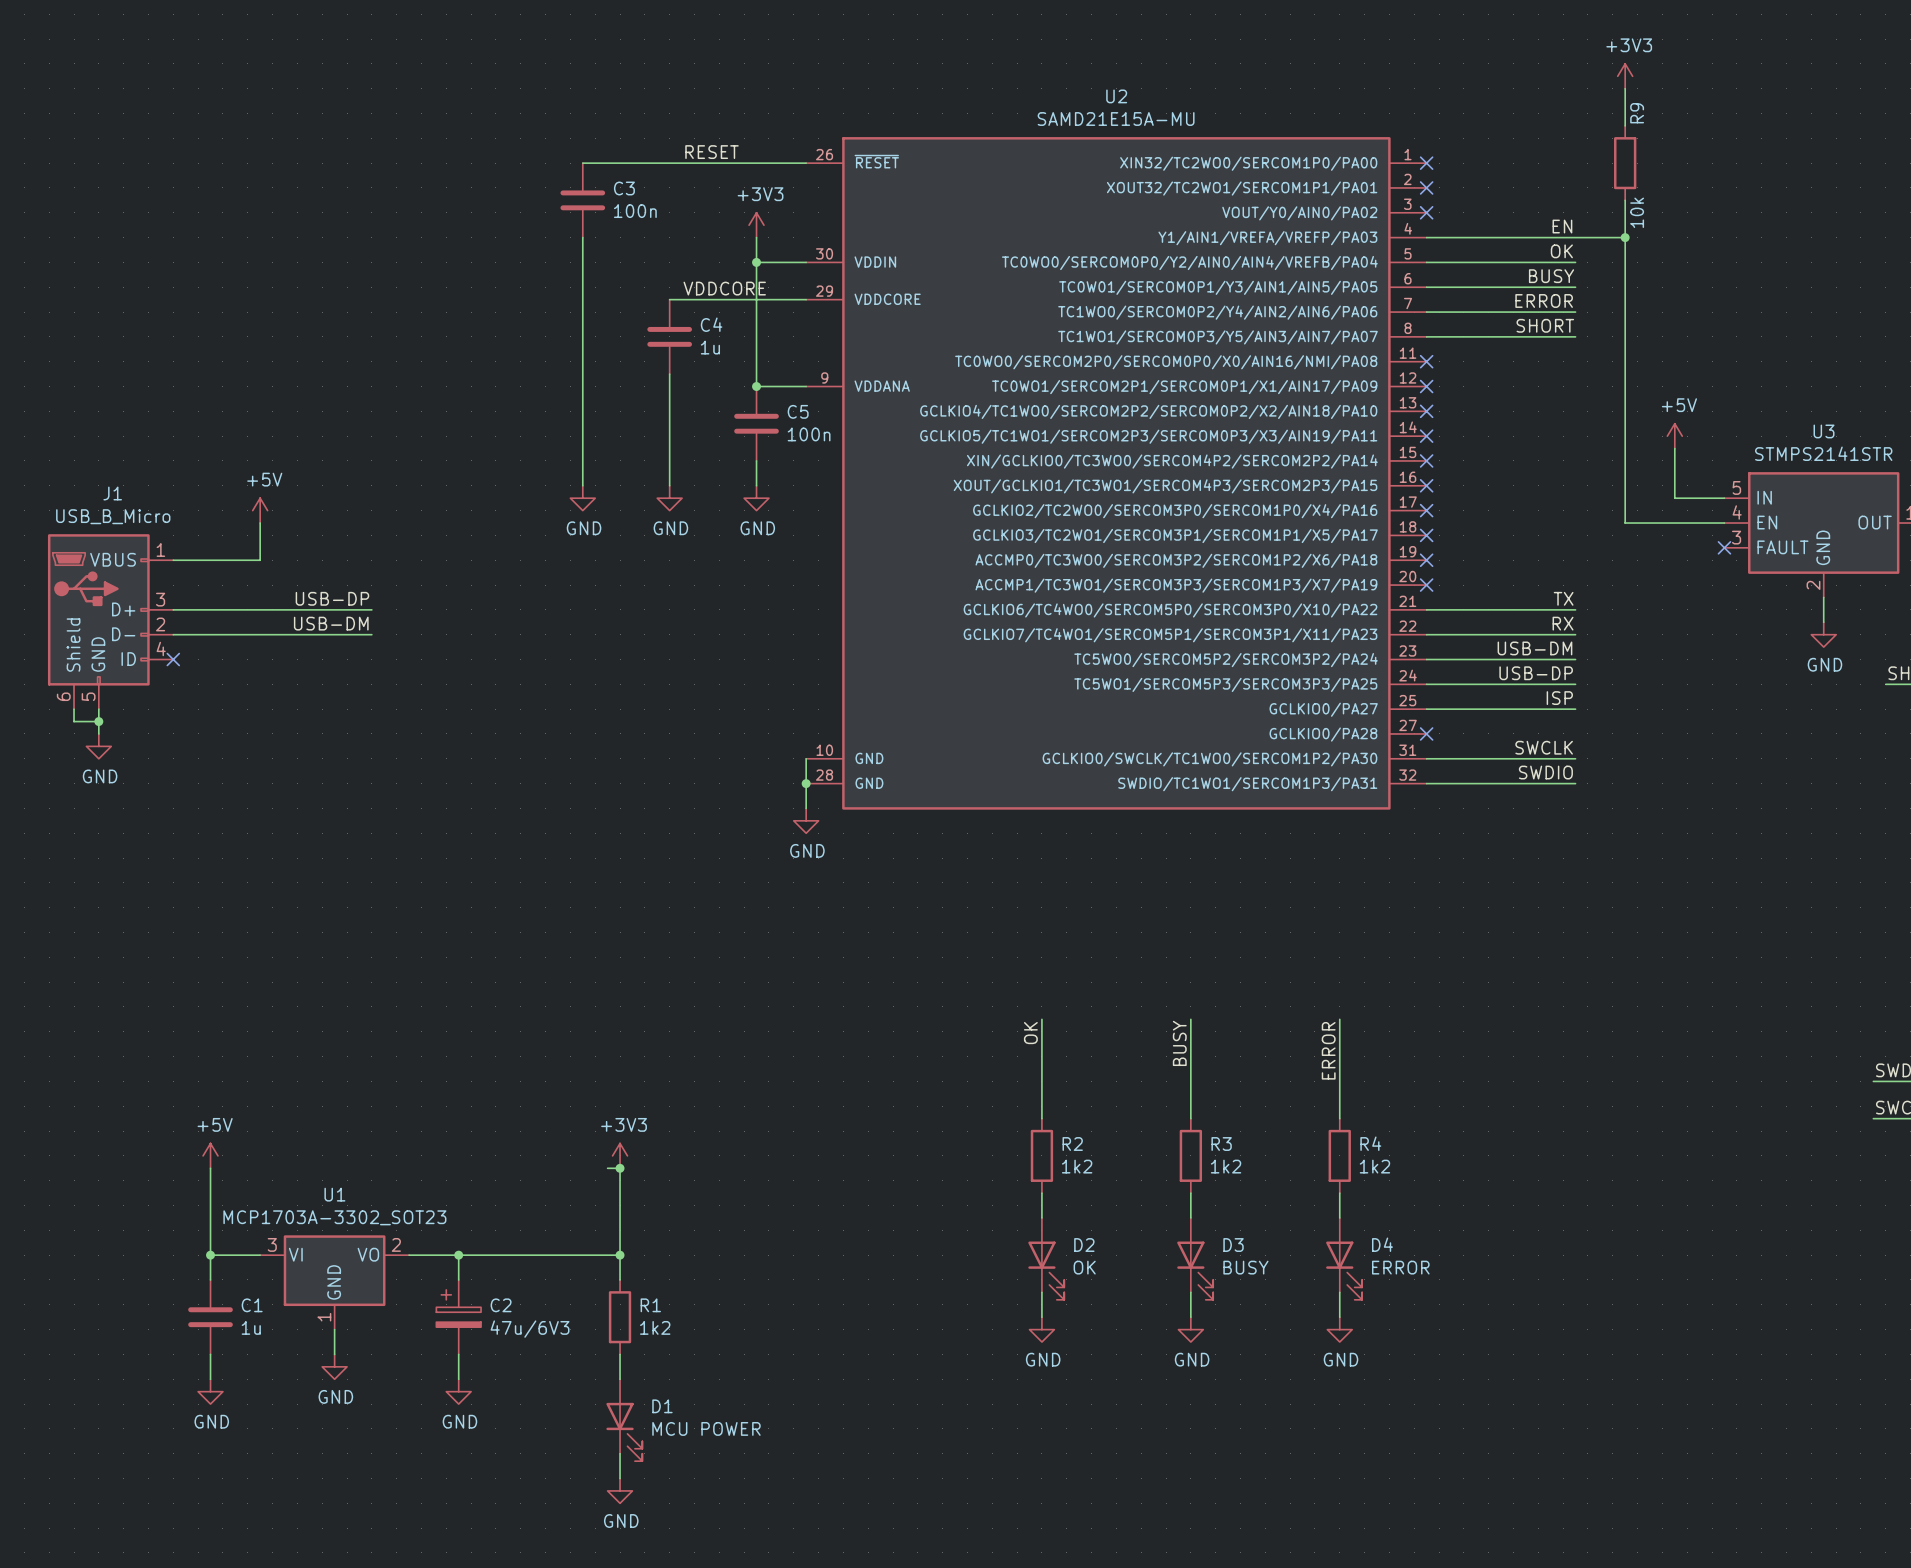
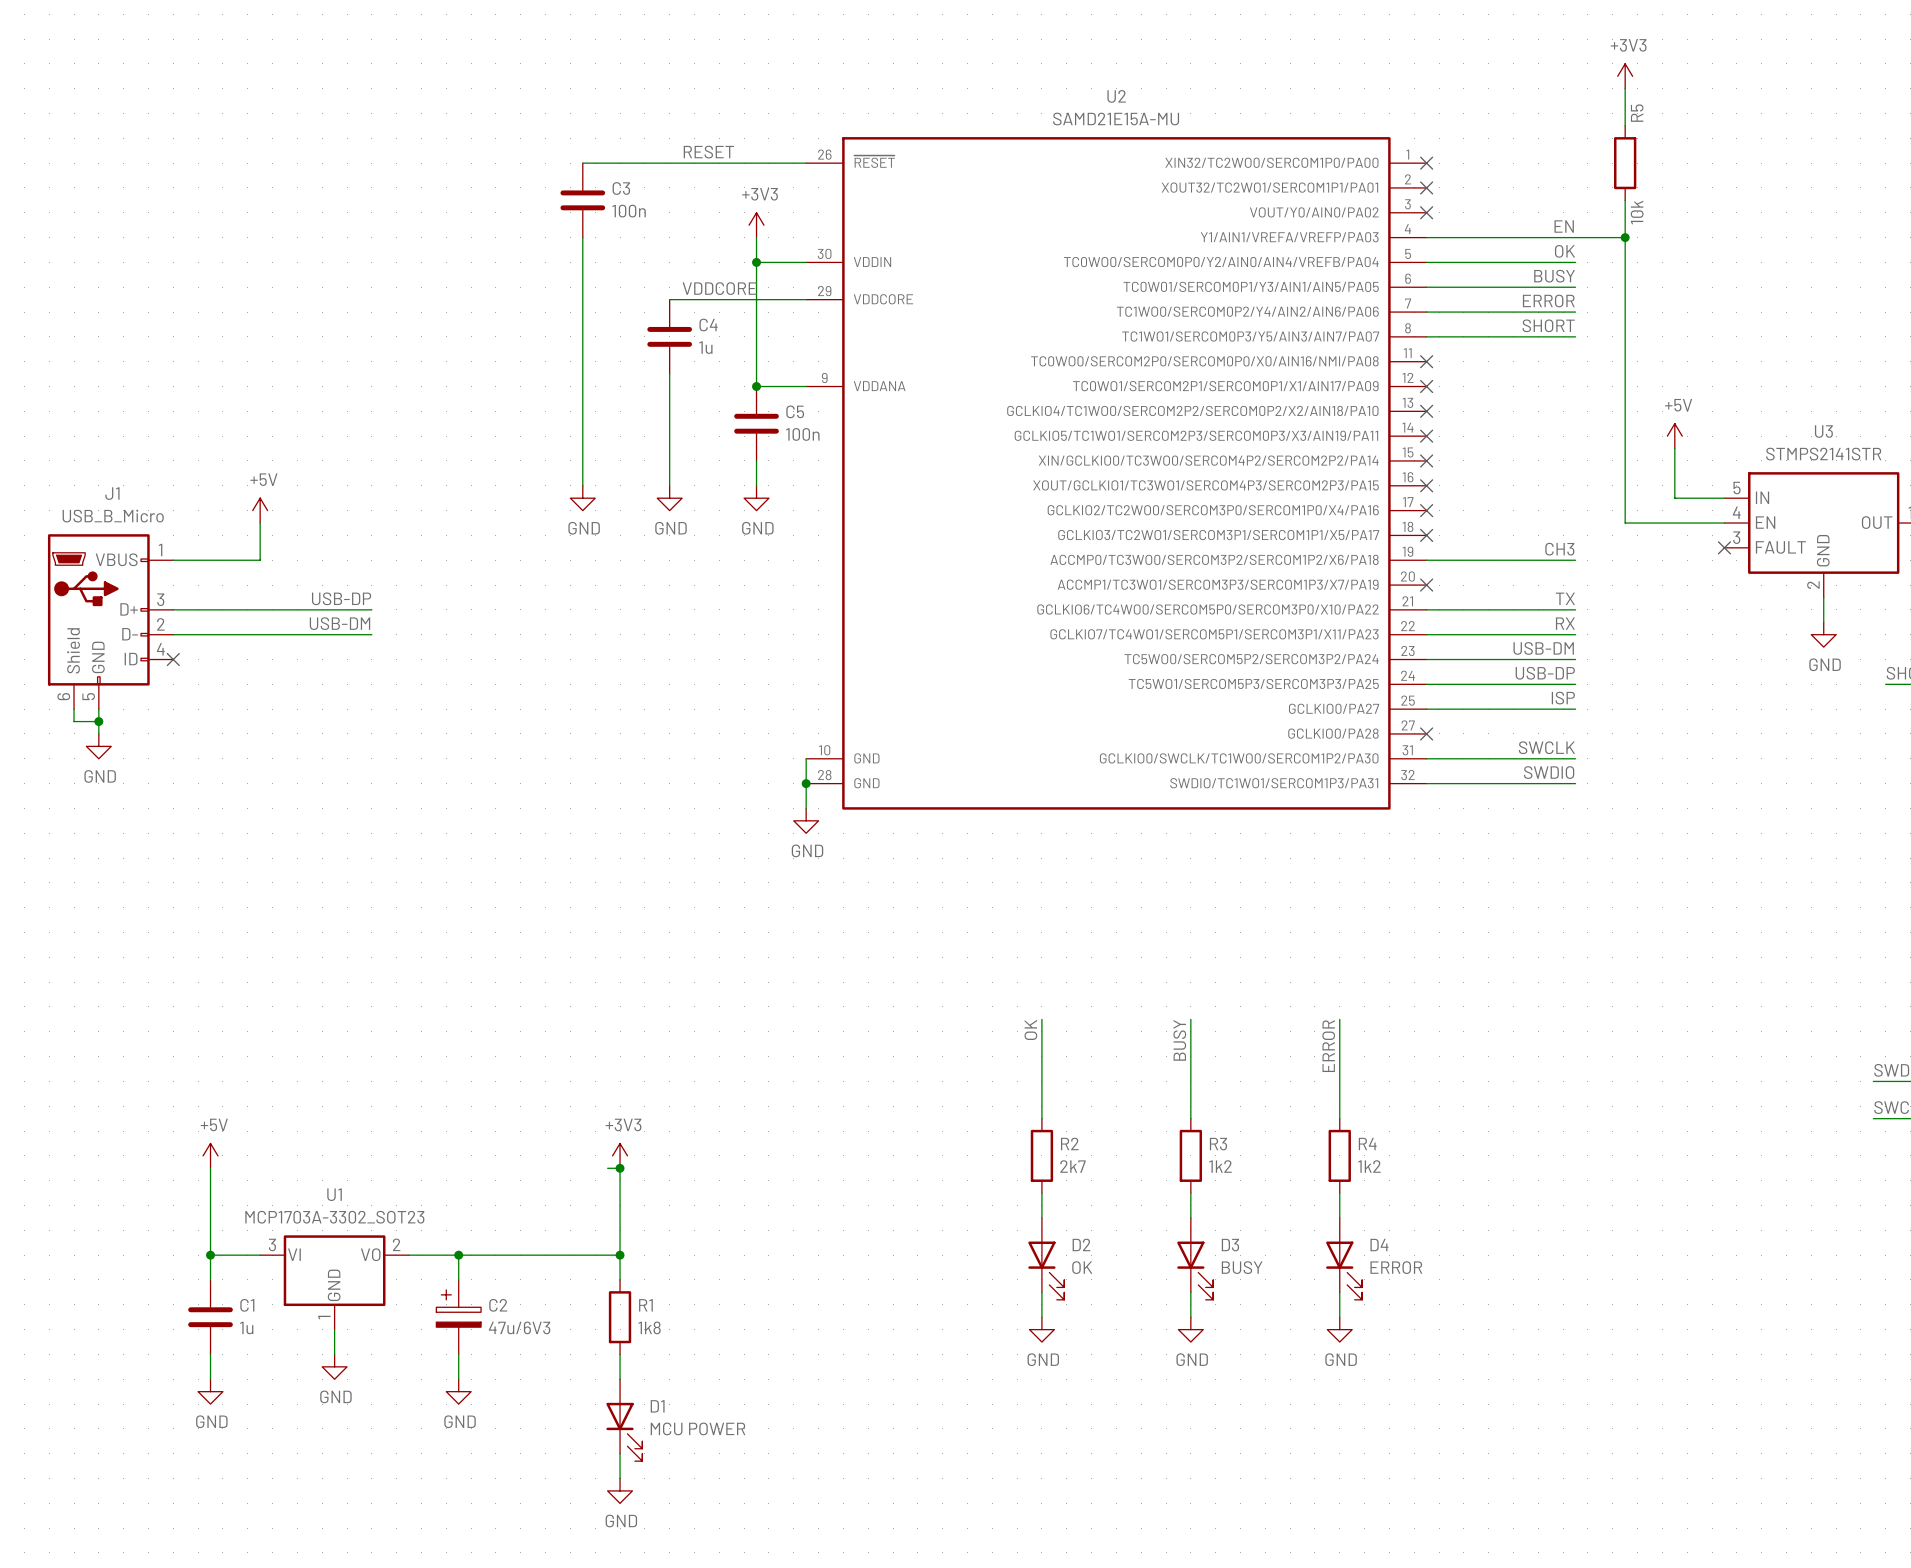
R9 name: R9 (1637, 113) -> R5 (1637, 113)
label: none -> CH3 (1559, 549)
wire: none -> (1426, 560) (1575, 560)
no-connect mark: (1426, 560) -> none
R2 value: 1k2 (1077, 1166) -> 2k7 (1073, 1166)
R1 value: 1k2 (655, 1327) -> 1k8 (649, 1327)

